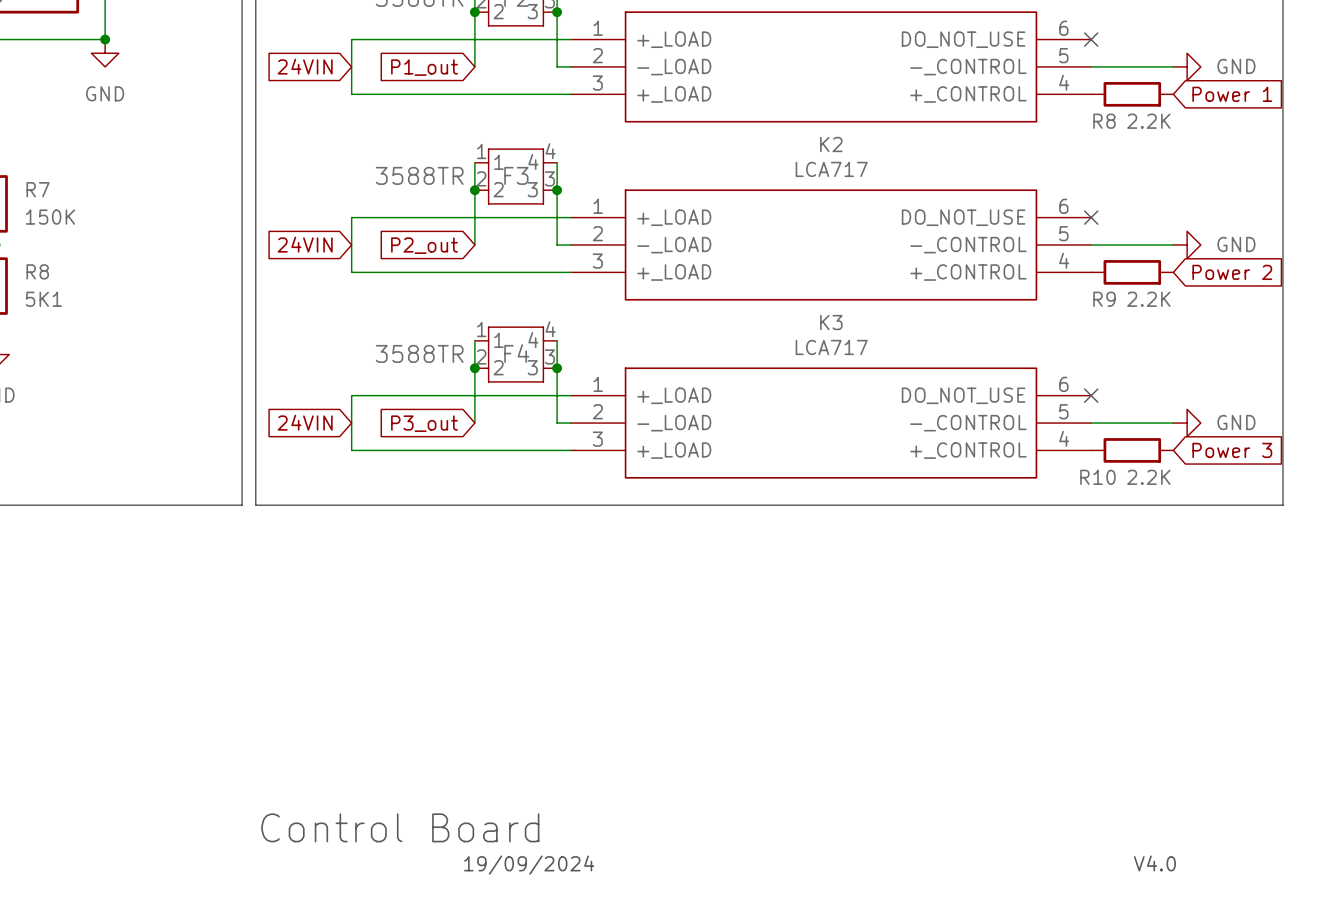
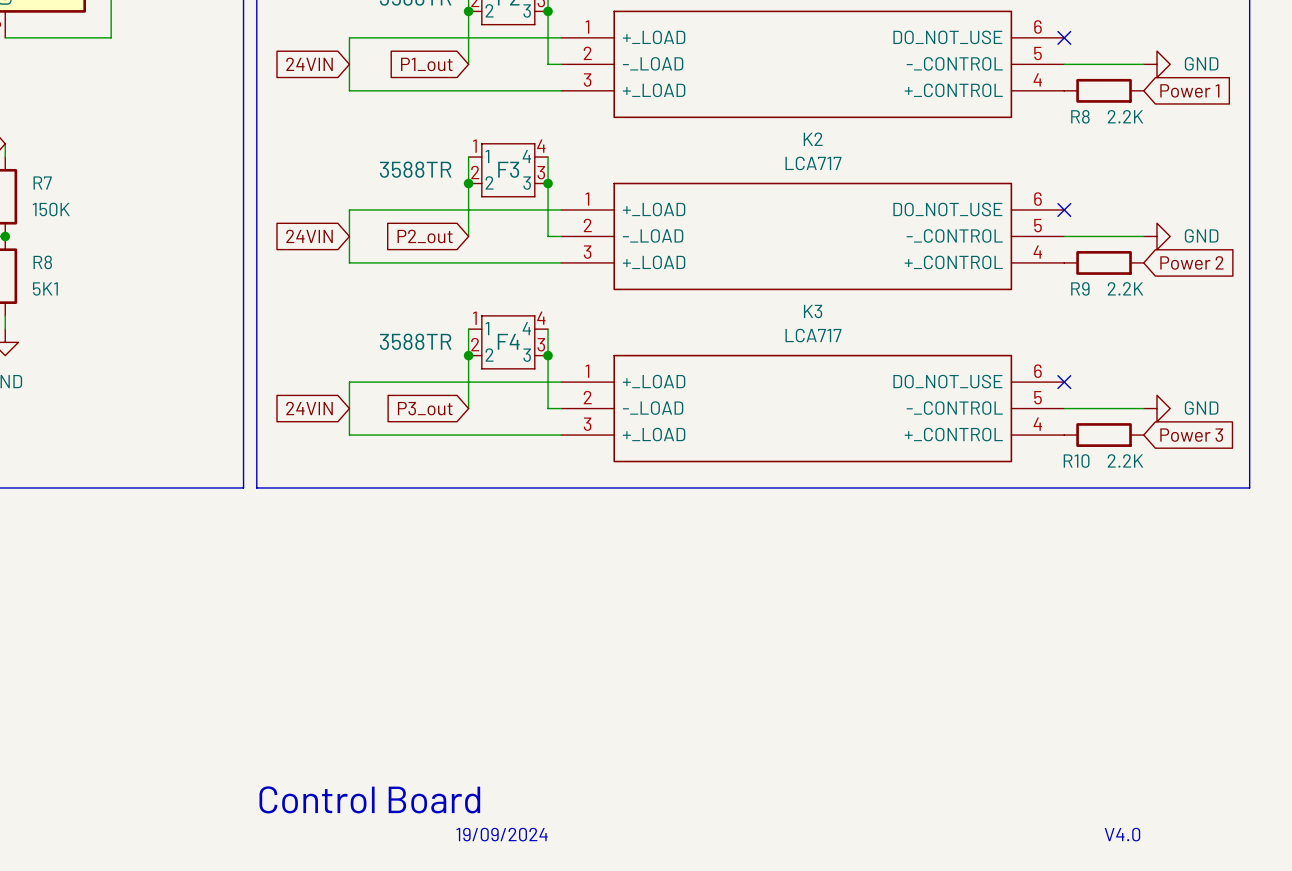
junction: (105, 39) -> none
power symbol: GND (105, 53) -> none

